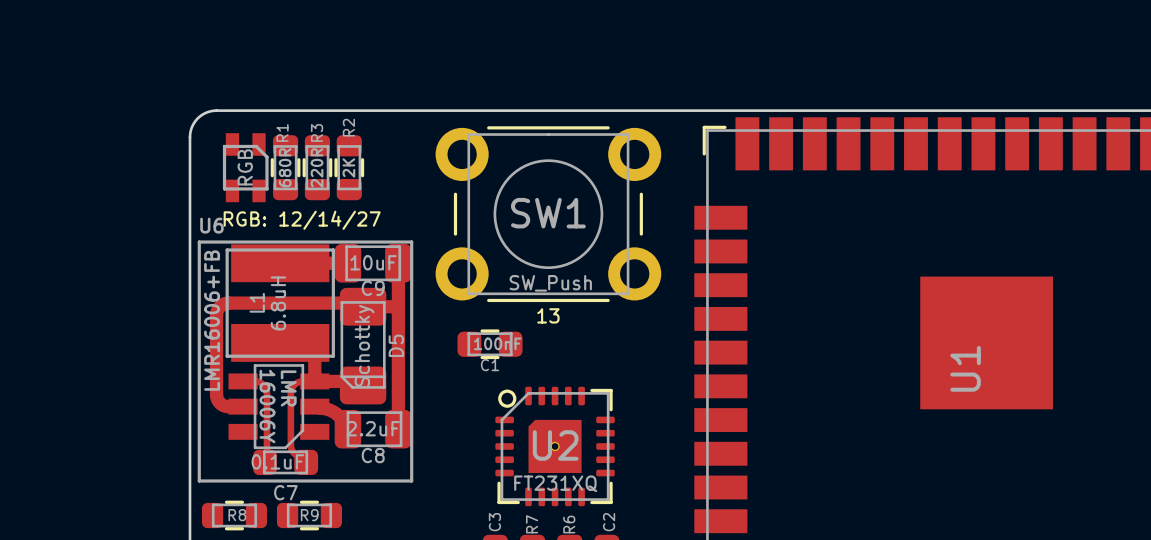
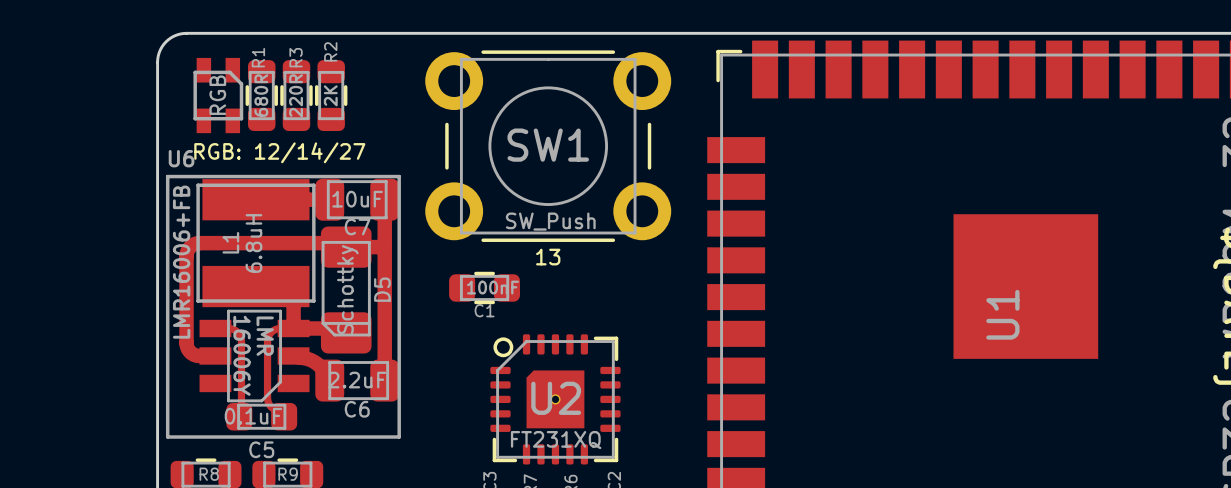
C9 name: C9 (373, 288) -> C7 (357, 226)
C8 name: C8 (373, 455) -> C6 (357, 409)
C7 name: C7 (285, 492) -> C5 (261, 449)

